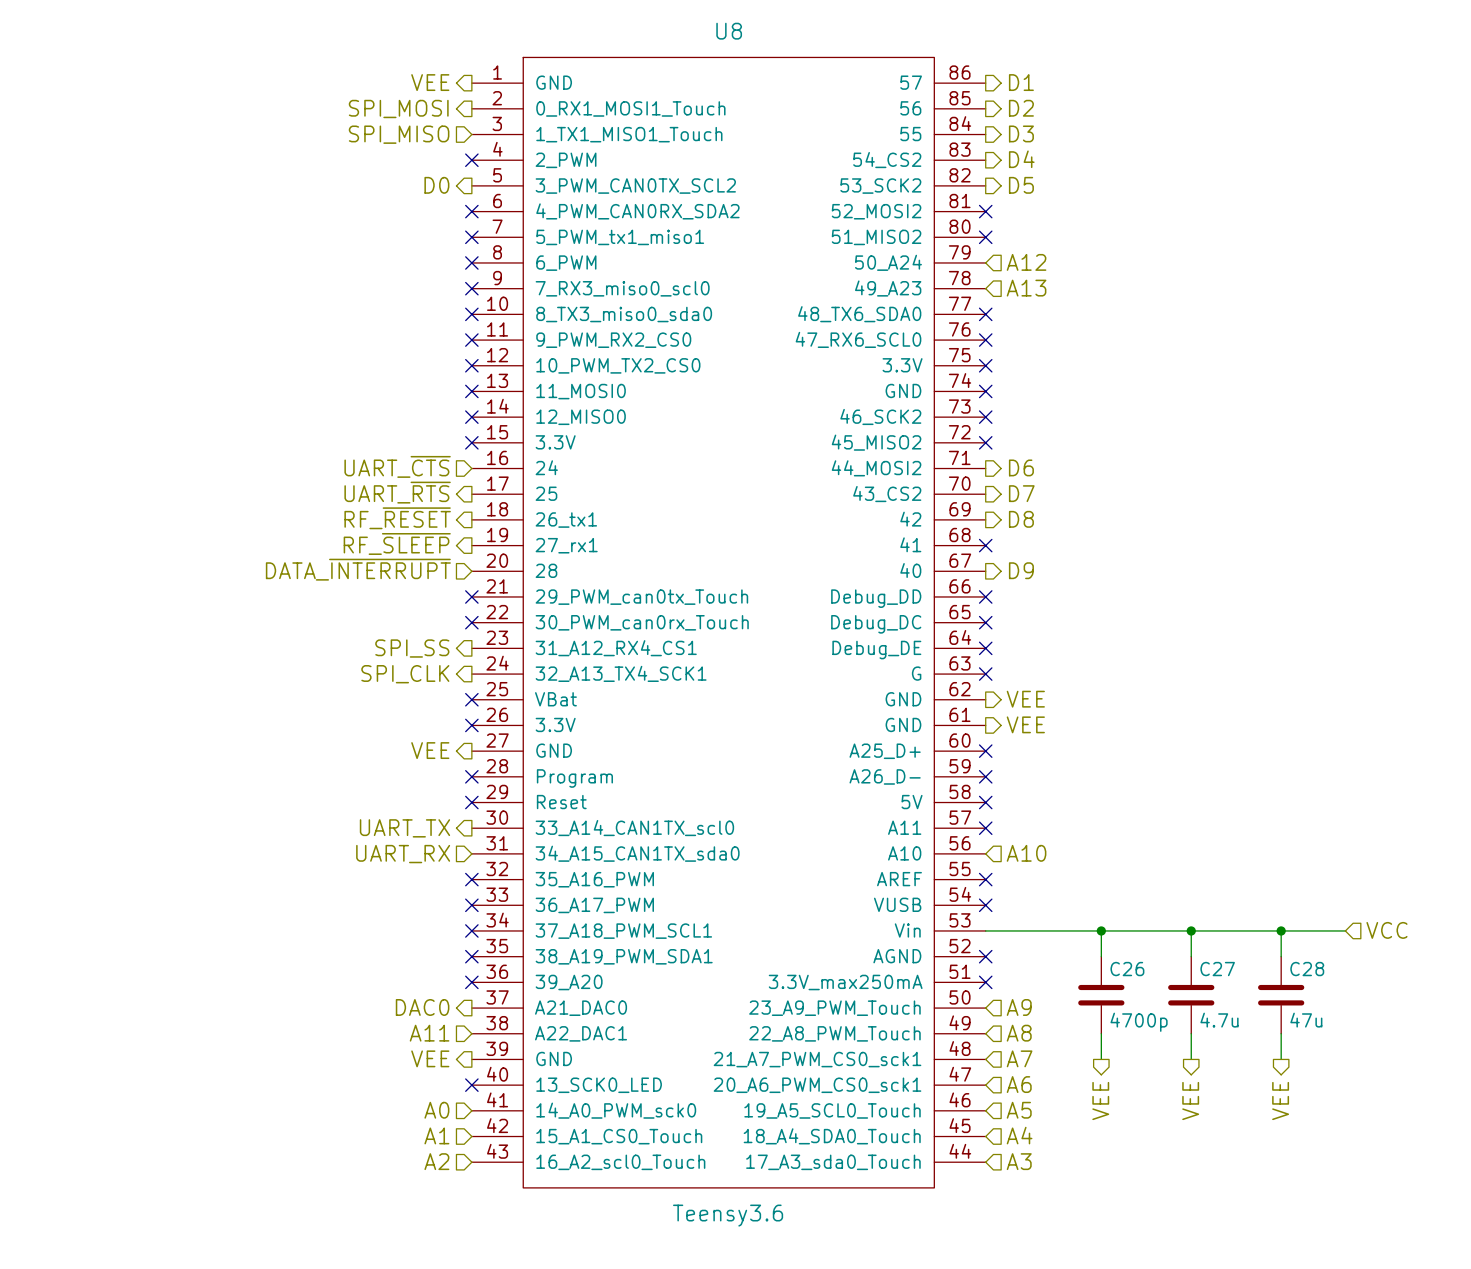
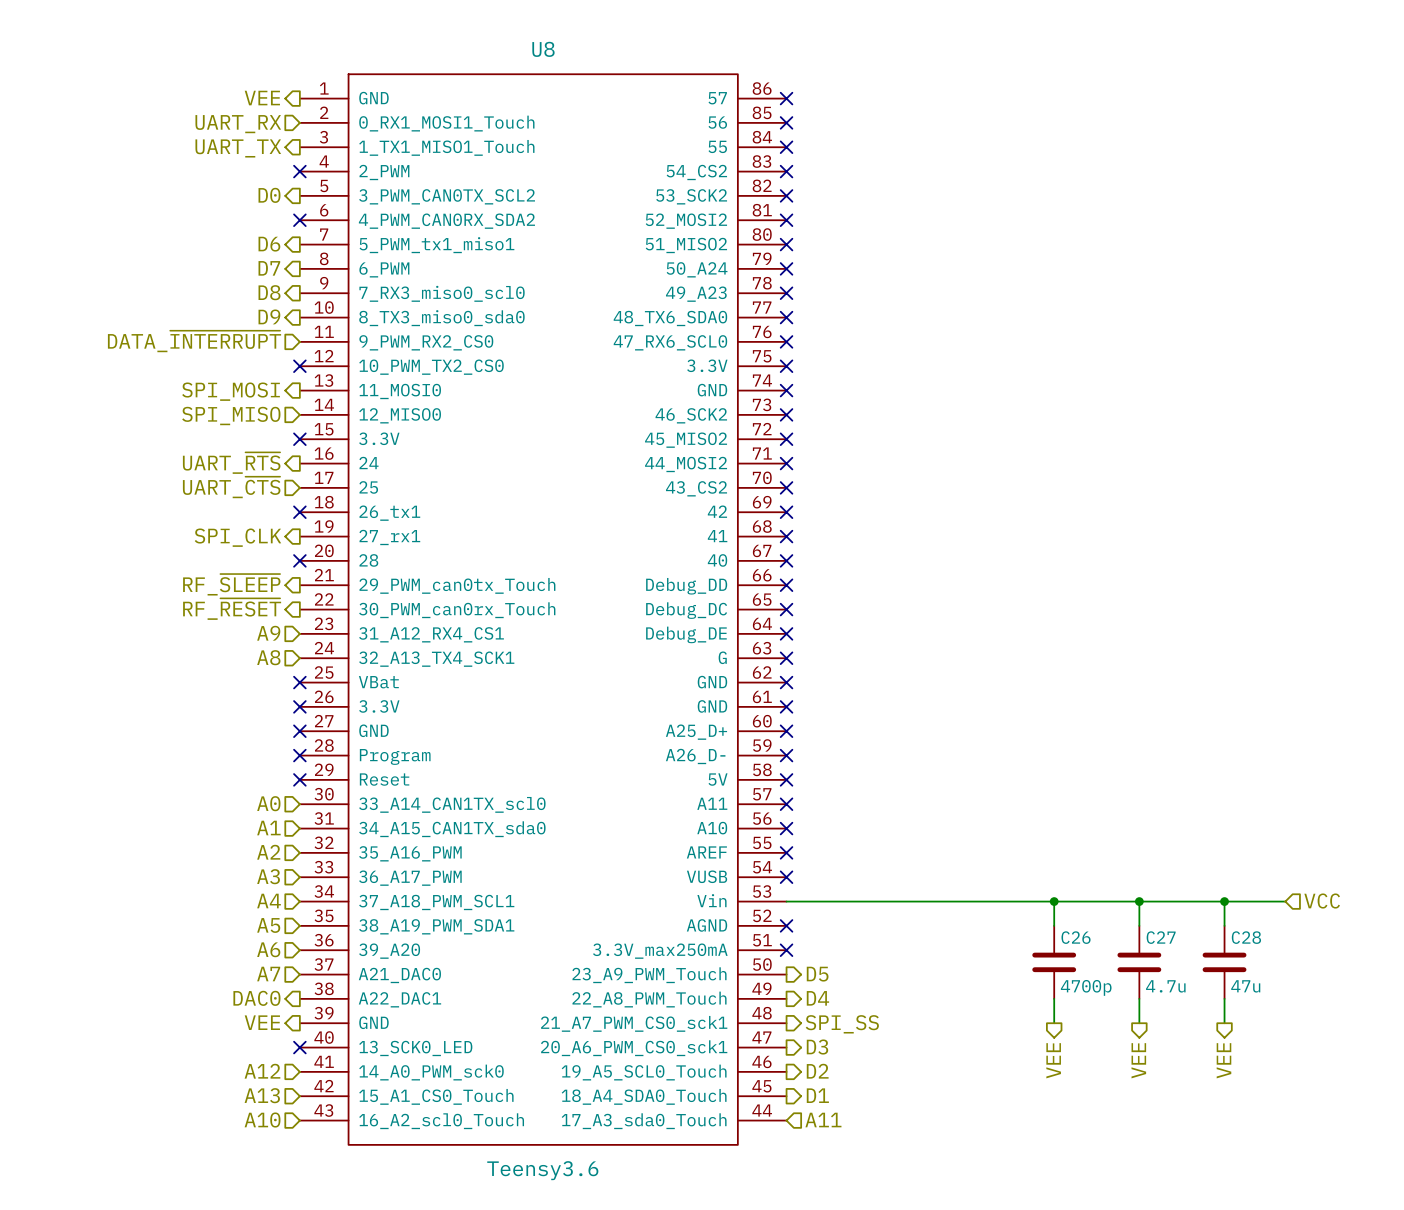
hierarchical label position: VEE (430, 82) -> VEE (262, 98)
hierarchical label: D1 (1021, 82) -> none
no-connect mark: none -> (786, 98)
hierarchical label: none -> UART_RX (238, 124)
hierarchical label: SPI_MOSI (398, 108) -> none
no-connect mark: none -> (786, 122)
hierarchical label: D2 (1021, 108) -> none
hierarchical label: D3 (1021, 133) -> none
hierarchical label: none -> UART_TX (238, 148)
hierarchical label: SPI_MISO (399, 134) -> none
no-connect mark: none -> (786, 147)
hierarchical label: D4 (1021, 159) -> none
no-connect mark: none -> (299, 171)
no-connect mark: (471, 160) -> none
no-connect mark: none -> (786, 171)
hierarchical label position: D0 (436, 185) -> D0 (269, 195)
no-connect mark: none -> (786, 195)
hierarchical label: D5 (1021, 185) -> none
no-connect mark: none -> (299, 220)
no-connect mark: (471, 211) -> none
no-connect mark: none -> (786, 220)
no-connect mark: (985, 211) -> none
hierarchical label: none -> D6 (269, 244)
no-connect mark: (471, 237) -> none
no-connect mark: none -> (786, 244)
no-connect mark: (985, 237) -> none
hierarchical label: none -> D7 (269, 268)
no-connect mark: (471, 262) -> none
no-connect mark: none -> (786, 268)
hierarchical label: A12 (1026, 262) -> none
hierarchical label: none -> D8 (269, 292)
no-connect mark: (471, 288) -> none
no-connect mark: none -> (786, 293)
hierarchical label: A13 (1026, 288) -> none
hierarchical label: none -> D9 (269, 316)
no-connect mark: (471, 314) -> none
no-connect mark: none -> (786, 317)
no-connect mark: (985, 314) -> none
hierarchical label: none -> DATA_~{INTERRUPT} (194, 341)
no-connect mark: (471, 340) -> none
no-connect mark: none -> (786, 341)
no-connect mark: (985, 340) -> none
no-connect mark: none -> (299, 366)
no-connect mark: (471, 365) -> none
no-connect mark: none -> (786, 366)
no-connect mark: (985, 365) -> none
hierarchical label: none -> SPI_MOSI (231, 391)
no-connect mark: (471, 391) -> none
no-connect mark: none -> (786, 390)
no-connect mark: (985, 391) -> none
hierarchical label: none -> SPI_MISO (231, 416)
no-connect mark: (471, 417) -> none
no-connect mark: none -> (786, 414)
no-connect mark: (985, 417) -> none
no-connect mark: none -> (299, 439)
no-connect mark: (471, 442) -> none
no-connect mark: none -> (786, 439)
no-connect mark: (985, 442) -> none
hierarchical label position: UART_~{CTS} (397, 466) -> UART_~{CTS} (231, 487)
hierarchical label: D6 (1021, 467) -> none
no-connect mark: none -> (786, 463)
hierarchical label position: UART_~{RTS} (397, 492) -> UART_~{RTS} (231, 463)
hierarchical label: D7 (1021, 493) -> none
no-connect mark: none -> (786, 487)
hierarchical label position: RF_~{RESET} (397, 518) -> RF_~{RESET} (232, 609)
no-connect mark: none -> (299, 512)
no-connect mark: none -> (786, 512)
hierarchical label: D8 (1021, 519) -> none
hierarchical label position: RF_~{SLEEP} (397, 543) -> RF_~{SLEEP} (231, 584)
no-connect mark: none -> (786, 536)
no-connect mark: (985, 545) -> none
hierarchical label: DATA_~{INTERRUPT} (358, 569) -> none
hierarchical label: D9 (1021, 570) -> none
no-connect mark: none -> (299, 560)
no-connect mark: none -> (786, 560)
no-connect mark: (471, 596) -> none
no-connect mark: none -> (786, 585)
no-connect mark: (985, 596) -> none
no-connect mark: (471, 622) -> none
U8 position: (728, 622) -> (543, 609)
no-connect mark: none -> (786, 609)
no-connect mark: (985, 622) -> none
hierarchical label: none -> A9 (268, 633)
hierarchical label: SPI_SS (412, 648) -> none
no-connect mark: none -> (786, 633)
no-connect mark: (985, 648) -> none
hierarchical label: none -> A8 (268, 657)
hierarchical label position: SPI_CLK (405, 674) -> SPI_CLK (237, 537)
no-connect mark: none -> (786, 658)
no-connect mark: (985, 674) -> none
no-connect mark: none -> (299, 682)
no-connect mark: (471, 699) -> none
no-connect mark: none -> (786, 682)
hierarchical label: VEE (1025, 699) -> none
hierarchical label: VEE (1025, 724) -> none
no-connect mark: none -> (299, 706)
no-connect mark: (471, 725) -> none
no-connect mark: none -> (786, 706)
hierarchical label: VEE (430, 750) -> none
no-connect mark: none -> (299, 731)
no-connect mark: none -> (786, 731)
no-connect mark: (985, 751) -> none
no-connect mark: none -> (299, 755)
no-connect mark: (471, 776) -> none
no-connect mark: none -> (786, 755)
no-connect mark: (985, 776) -> none
no-connect mark: none -> (299, 779)
no-connect mark: (471, 802) -> none
no-connect mark: none -> (786, 779)
no-connect mark: (985, 802) -> none
hierarchical label: none -> A0 (268, 803)
hierarchical label: UART_TX (404, 828) -> none
no-connect mark: none -> (786, 804)
no-connect mark: (985, 828) -> none
hierarchical label: none -> A1 (268, 828)
no-connect mark: none -> (786, 828)
hierarchical label: A10 (1026, 853) -> none
hierarchical label: UART_RX (403, 854) -> none
hierarchical label: none -> A2 (268, 852)
no-connect mark: (471, 879) -> none
no-connect mark: none -> (786, 852)
no-connect mark: (985, 879) -> none
hierarchical label: none -> A3 (268, 876)
no-connect mark: (471, 905) -> none
no-connect mark: none -> (786, 877)
no-connect mark: (985, 905) -> none
hierarchical label: none -> A4 (269, 901)
no-connect mark: (471, 930) -> none
wire: none -> (786, 901) (944, 901)
hierarchical label: none -> A5 (268, 925)
no-connect mark: (471, 956) -> none
no-connect mark: none -> (786, 925)
no-connect mark: (985, 956) -> none
hierarchical label: none -> A6 (268, 949)
no-connect mark: (471, 982) -> none
no-connect mark: none -> (786, 950)
no-connect mark: (985, 982) -> none
hierarchical label: none -> A7 (268, 974)
hierarchical label position: DAC0 (422, 1007) -> DAC0 (256, 998)
hierarchical label: none -> D5 (817, 974)
hierarchical label: A9 (1019, 1007) -> none
hierarchical label: none -> D4 (817, 998)
hierarchical label: A11 (429, 1033) -> none
hierarchical label: A8 (1019, 1033) -> none
hierarchical label position: VEE (430, 1058) -> VEE (262, 1022)
hierarchical label: A7 (1019, 1058) -> none
hierarchical label: none -> SPI_SS (842, 1024)
hierarchical label: none -> D3 (817, 1047)
hierarchical label: A6 (1019, 1084) -> none
no-connect mark: none -> (299, 1047)
no-connect mark: (471, 1085) -> none
hierarchical label: none -> A12 (262, 1071)
hierarchical label: A0 (436, 1110) -> none
hierarchical label: none -> D2 (817, 1071)
hierarchical label: A5 (1019, 1110) -> none
hierarchical label: none -> A13 (262, 1095)
hierarchical label: A1 (436, 1135) -> none
hierarchical label: none -> D1 (817, 1095)
hierarchical label: A4 (1019, 1135) -> none
hierarchical label: none -> A10 (262, 1120)
hierarchical label: A2 (436, 1161) -> none
hierarchical label: none -> A11 (823, 1120)
hierarchical label: A3 (1019, 1161) -> none

